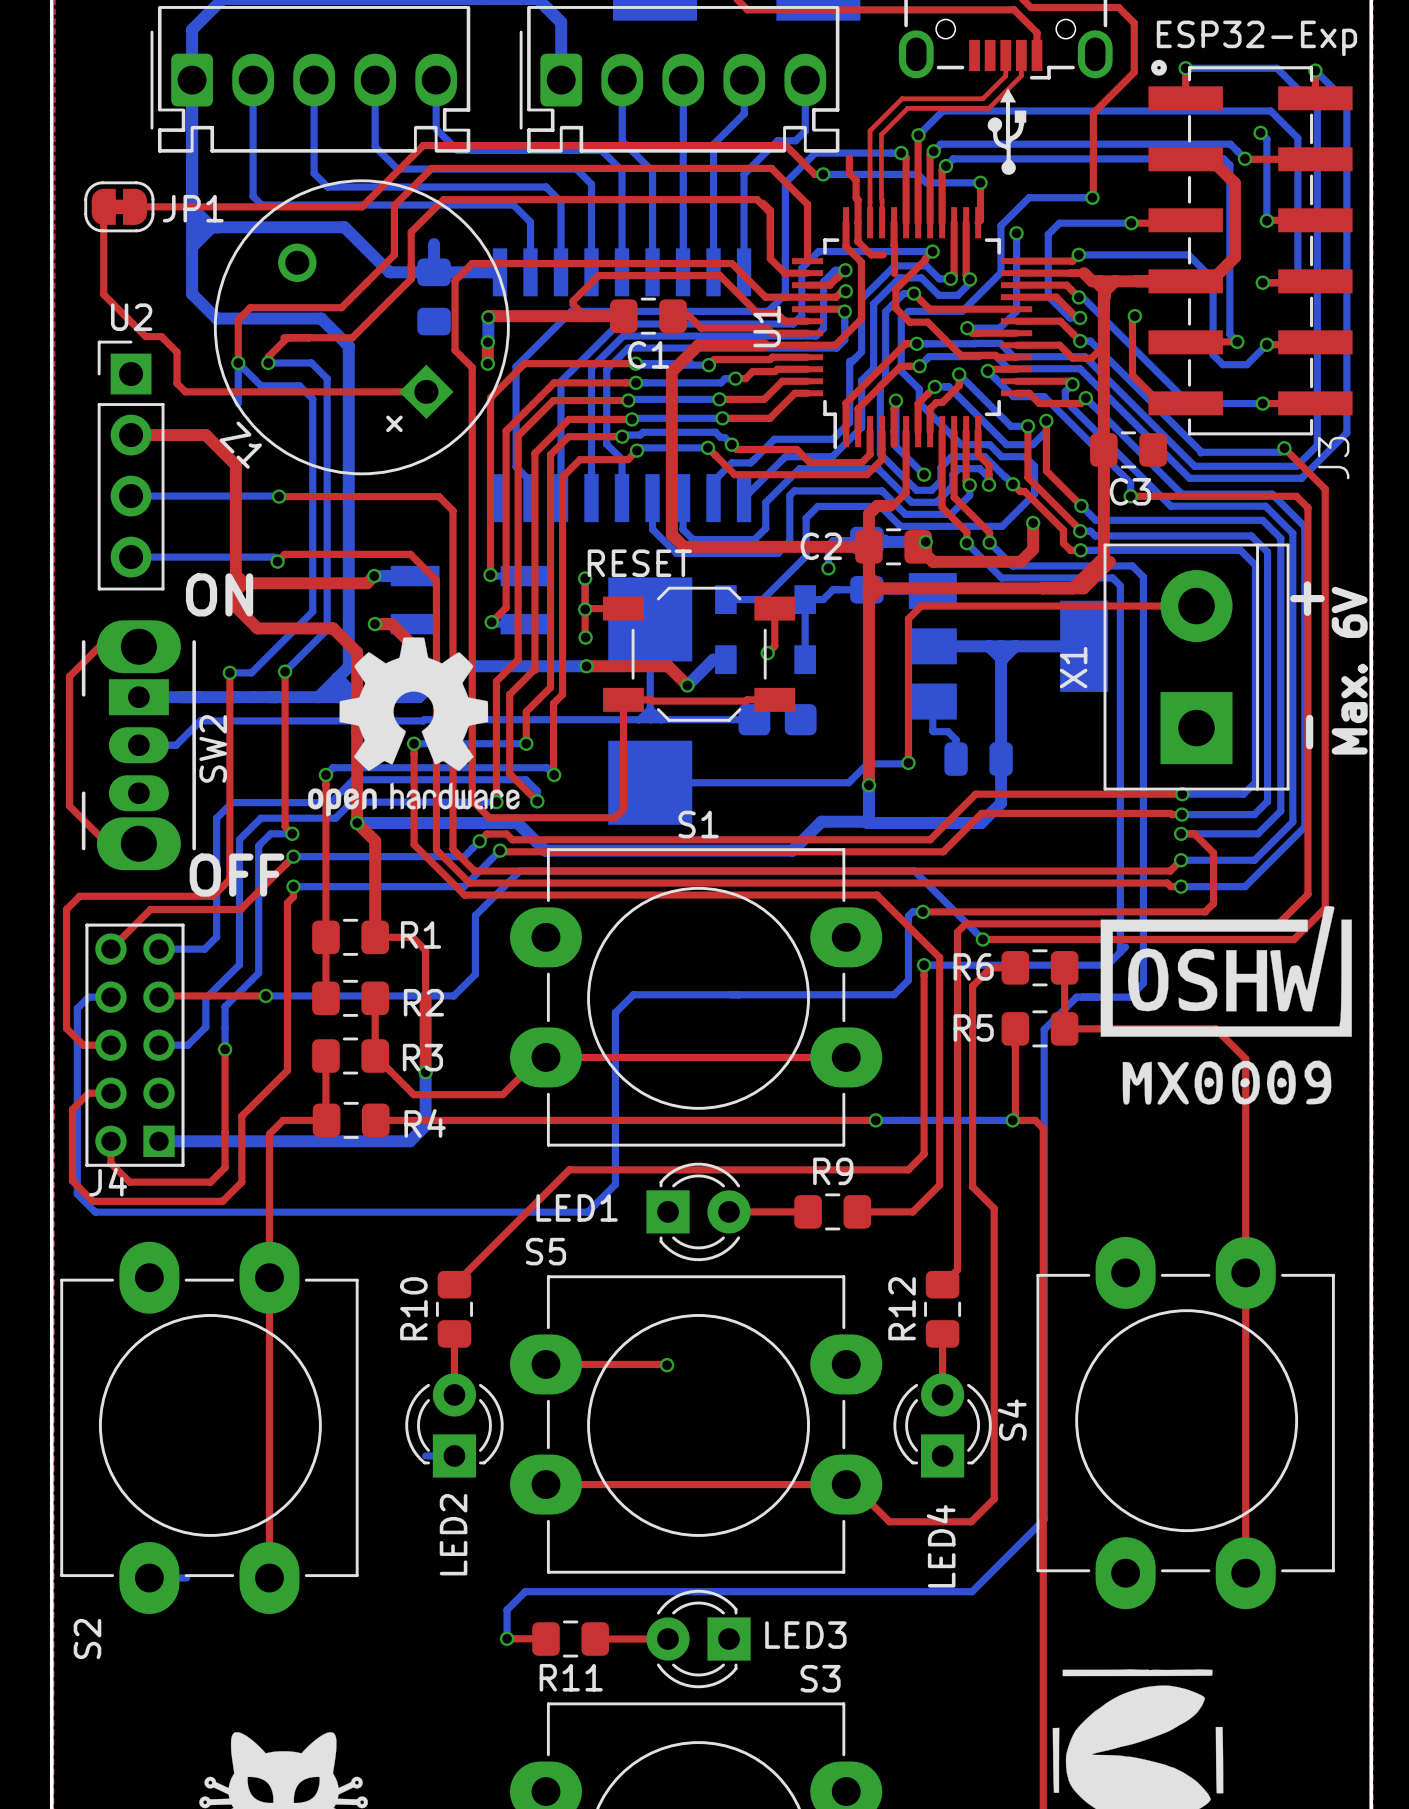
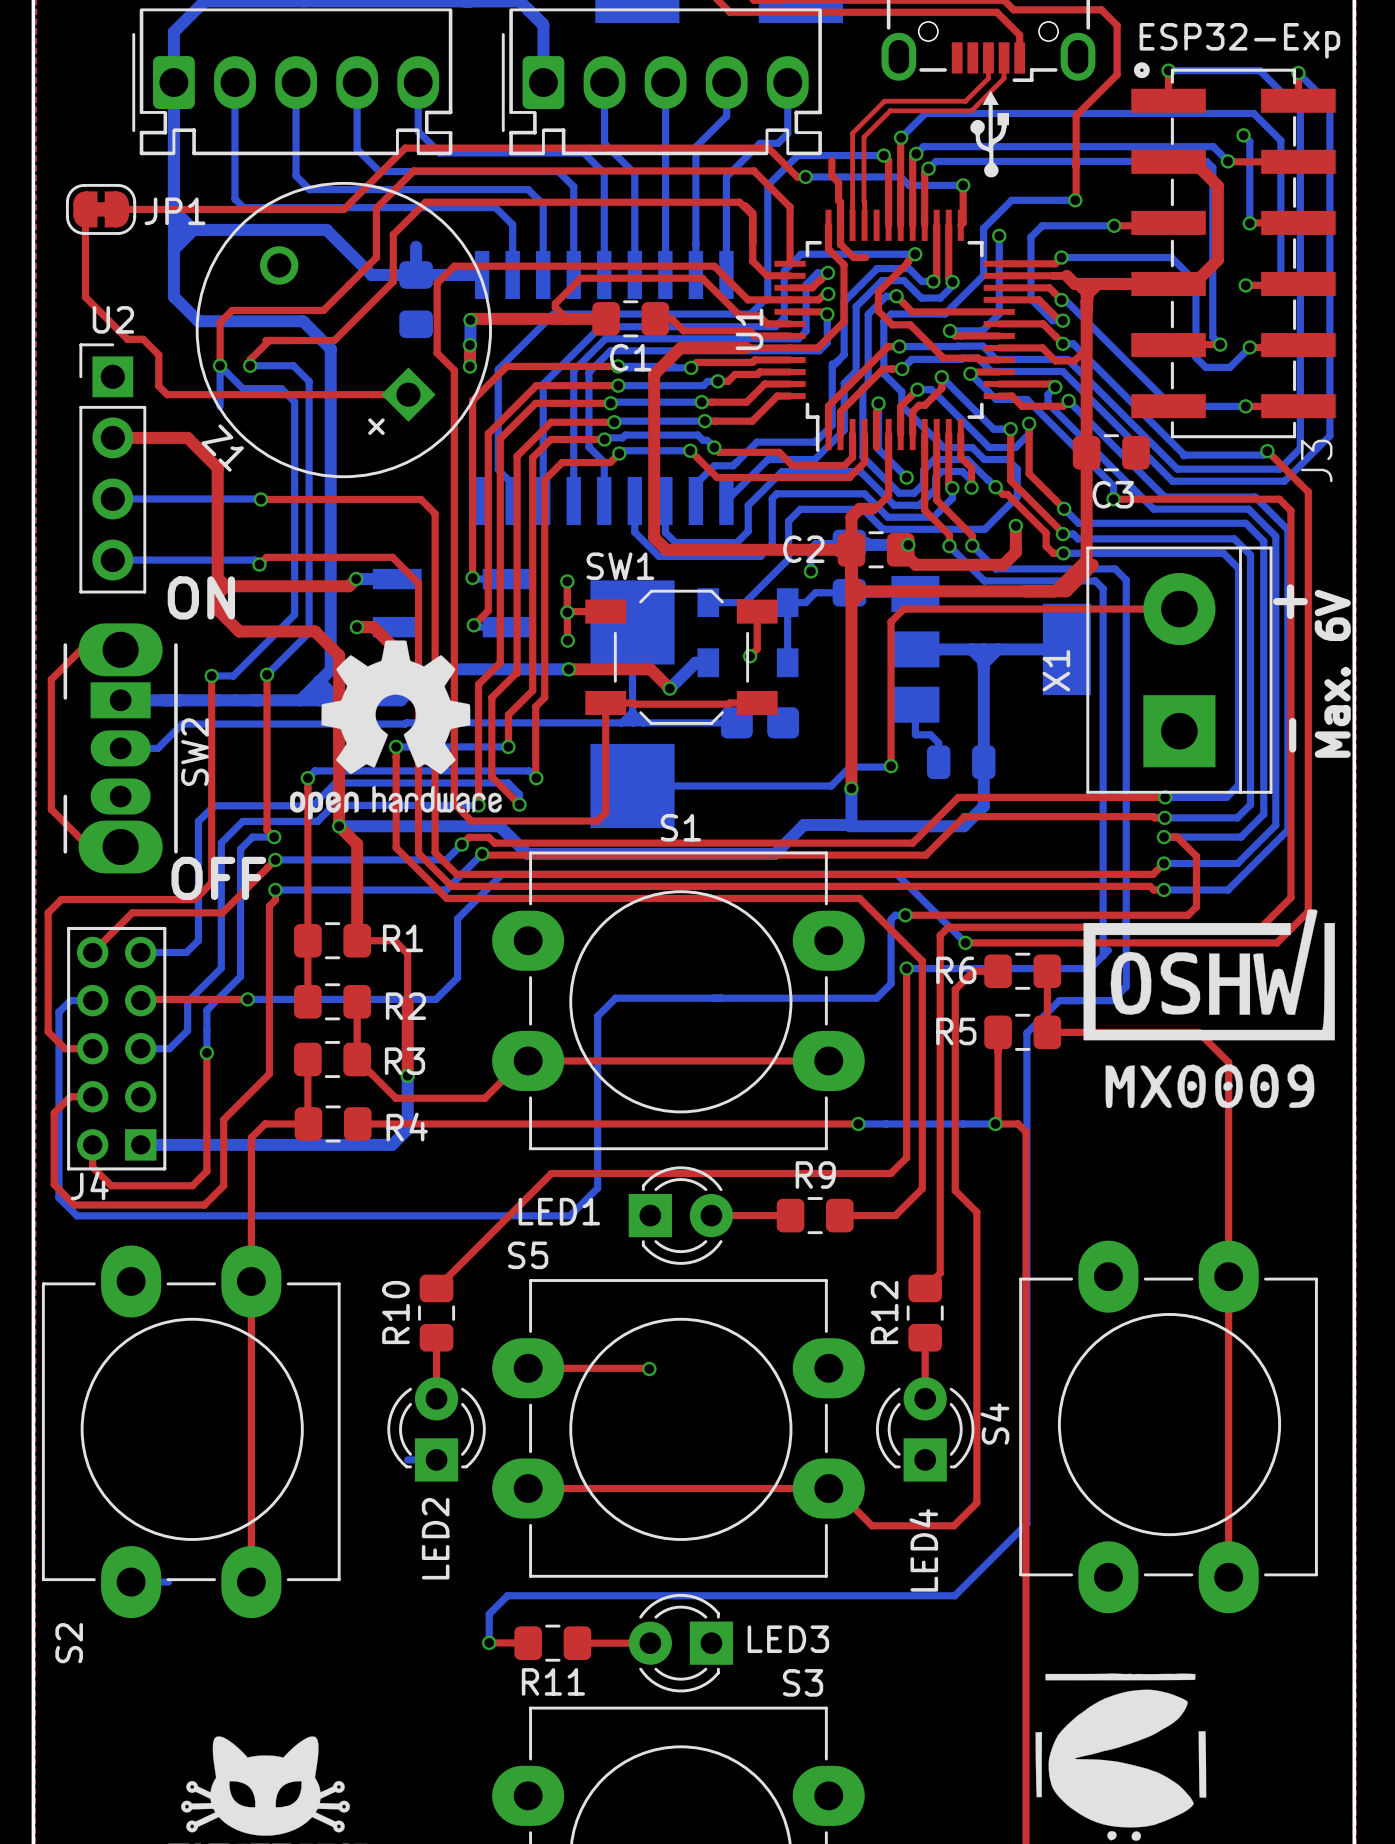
top track: (894, 222) (894, 273) -> none
top track: (1134, 316) (1132, 318) (1132, 375) (1160, 403) (1185, 403) -> none
via: (1134, 316) -> none
RESET name: RESET (639, 563) -> SW1 (620, 566)

